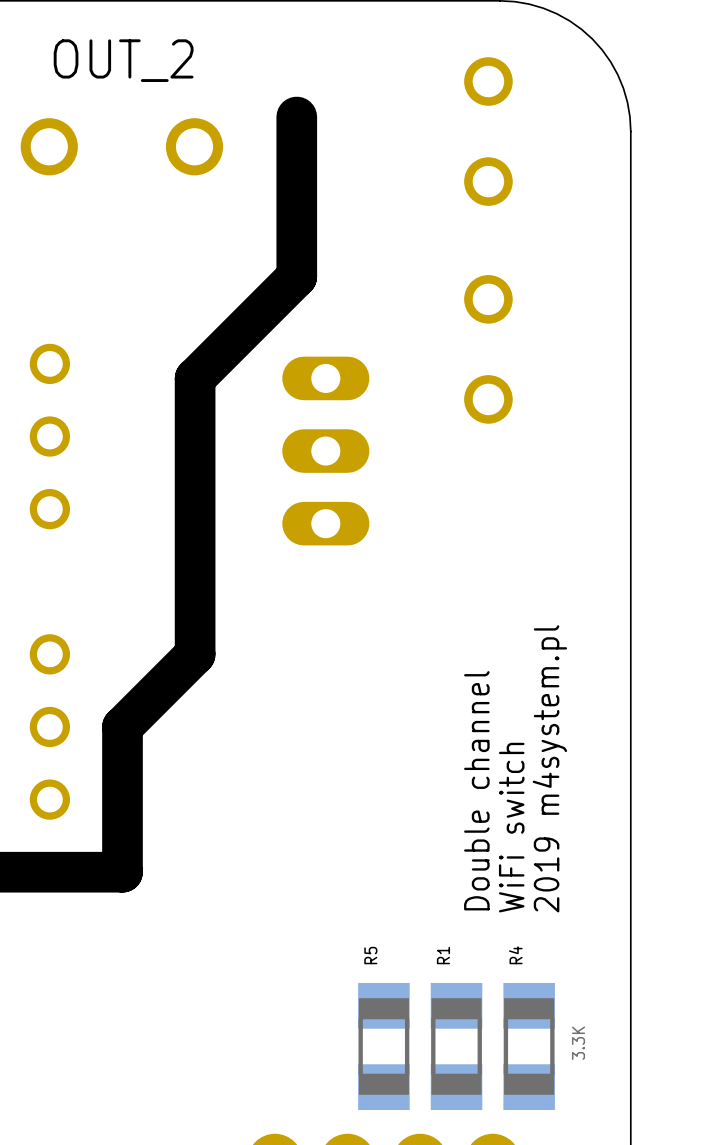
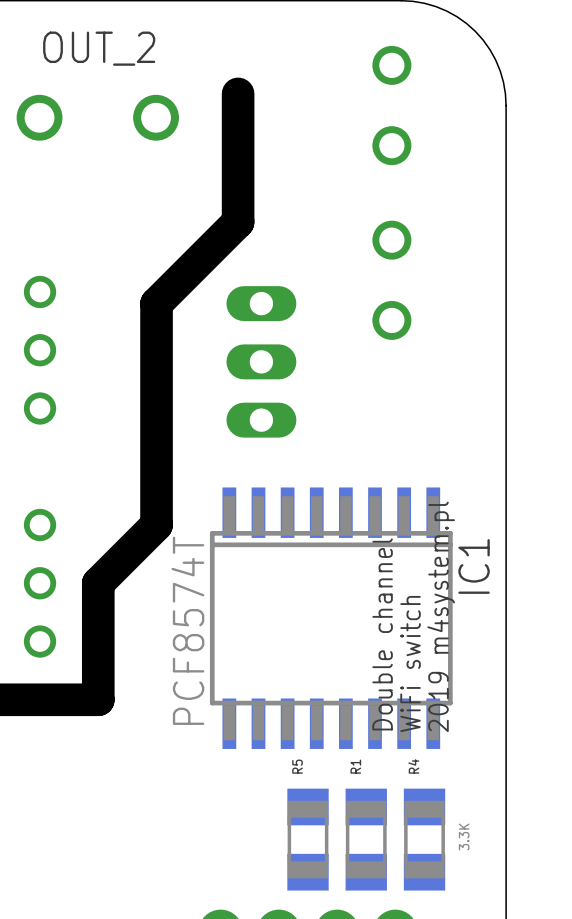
IC1: none -> PCF8574T (331, 618)

